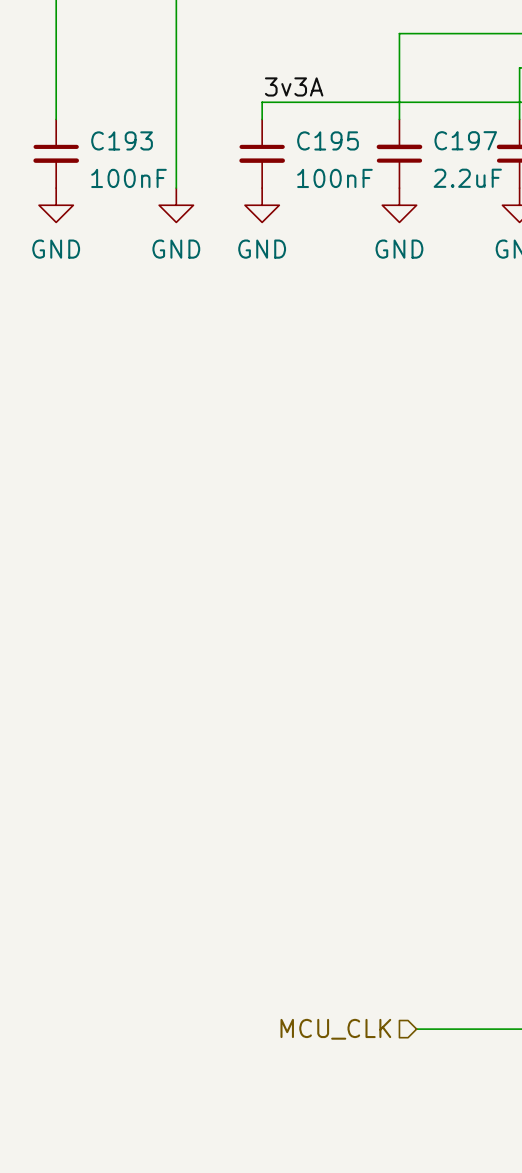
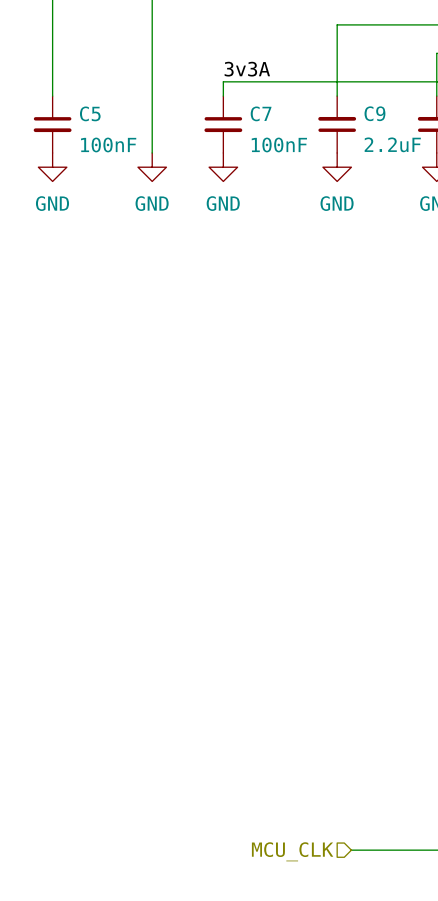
C193 name: C193 (122, 140) -> C5 (90, 113)
C195 name: C195 (328, 140) -> C7 (261, 113)
C197 name: C197 (465, 140) -> C9 (374, 113)

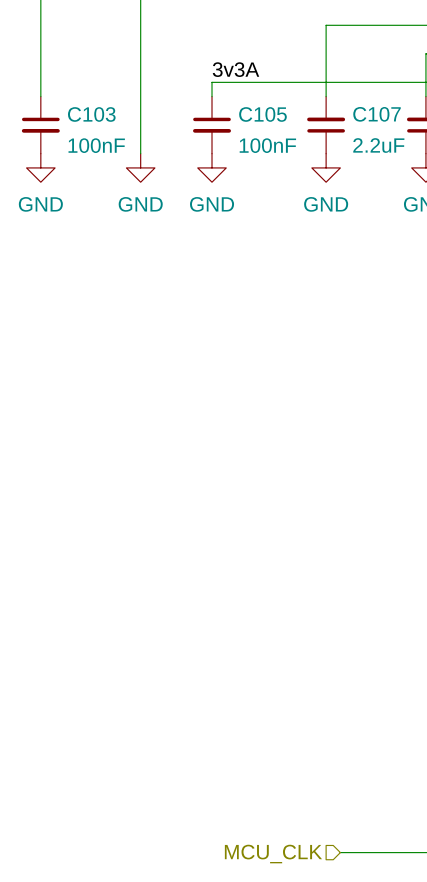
C5 name: C5 (90, 113) -> C103 (91, 114)
C7 name: C7 (261, 113) -> C105 (262, 114)
C9 name: C9 (374, 113) -> C107 (377, 114)

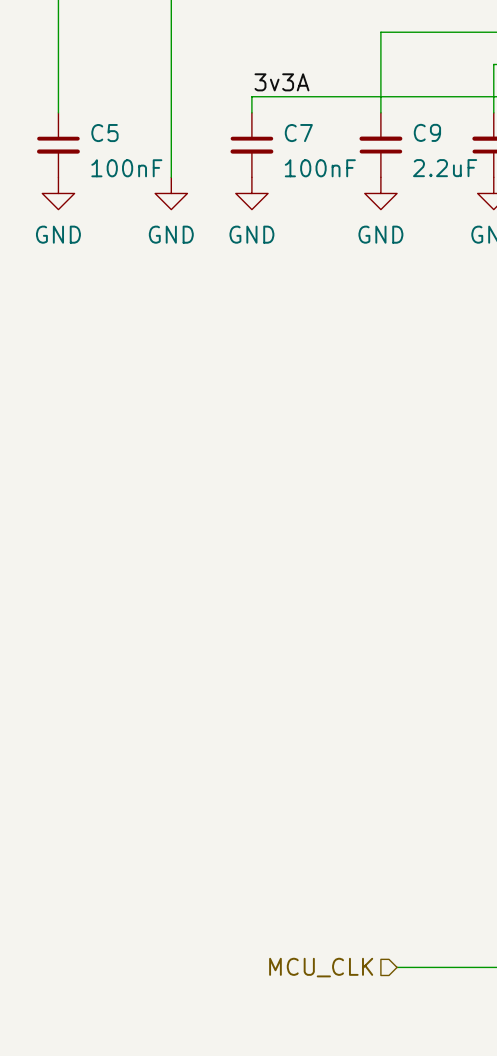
C103 name: C103 (91, 114) -> C5 (104, 133)
C105 name: C105 (262, 114) -> C7 (298, 133)
C107 name: C107 (377, 114) -> C9 (427, 132)

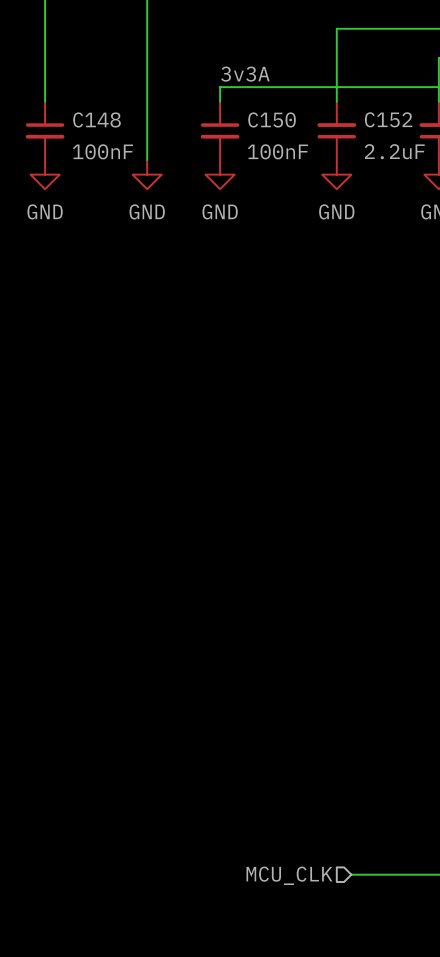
C9 name: C9 (427, 132) -> C152 (388, 119)
C5 name: C5 (104, 133) -> C148 (97, 119)
C7 name: C7 (298, 133) -> C150 (272, 119)

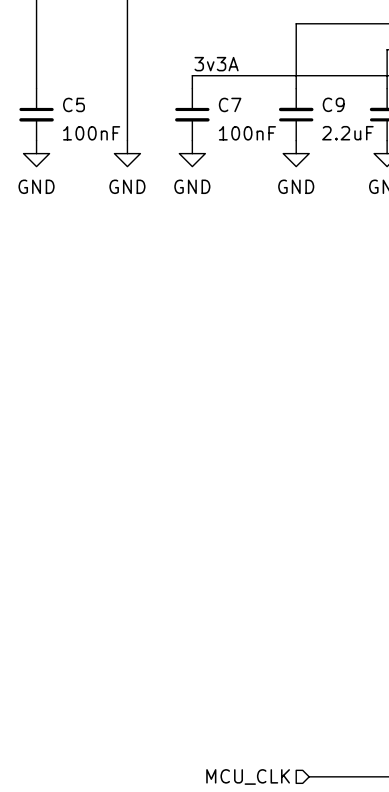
C148 name: C148 (97, 119) -> C5 (74, 104)
C150 name: C150 (272, 119) -> C7 (230, 104)
C152 name: C152 (388, 119) -> C9 (333, 104)

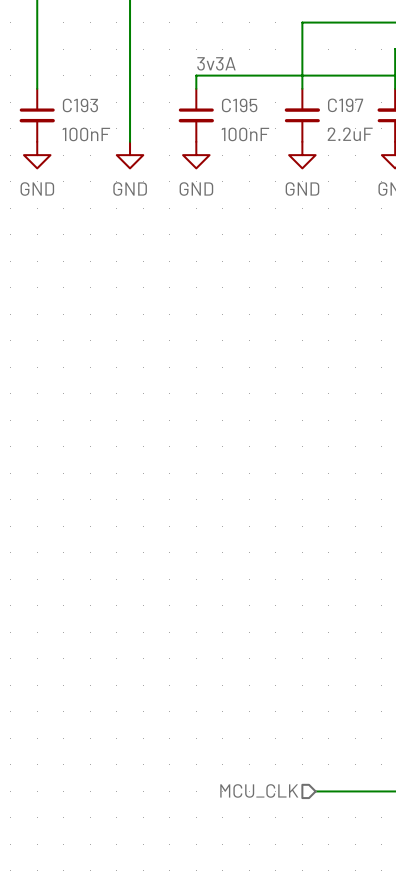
C5 name: C5 (74, 104) -> C193 (80, 105)
C7 name: C7 (230, 104) -> C195 (239, 105)
C9 name: C9 (333, 104) -> C197 (345, 105)

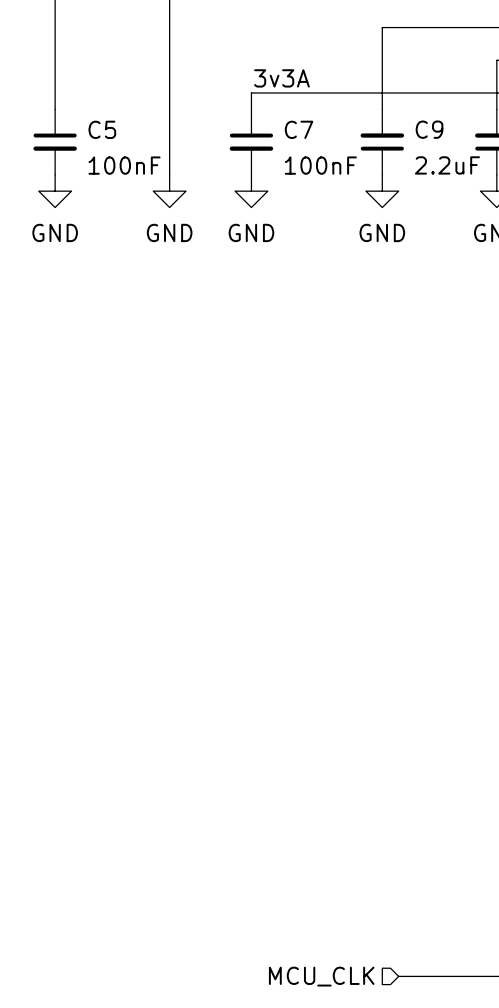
C193 name: C193 (80, 105) -> C5 (102, 129)
C195 name: C195 (239, 105) -> C7 (299, 129)
C197 name: C197 (345, 105) -> C9 (429, 129)

